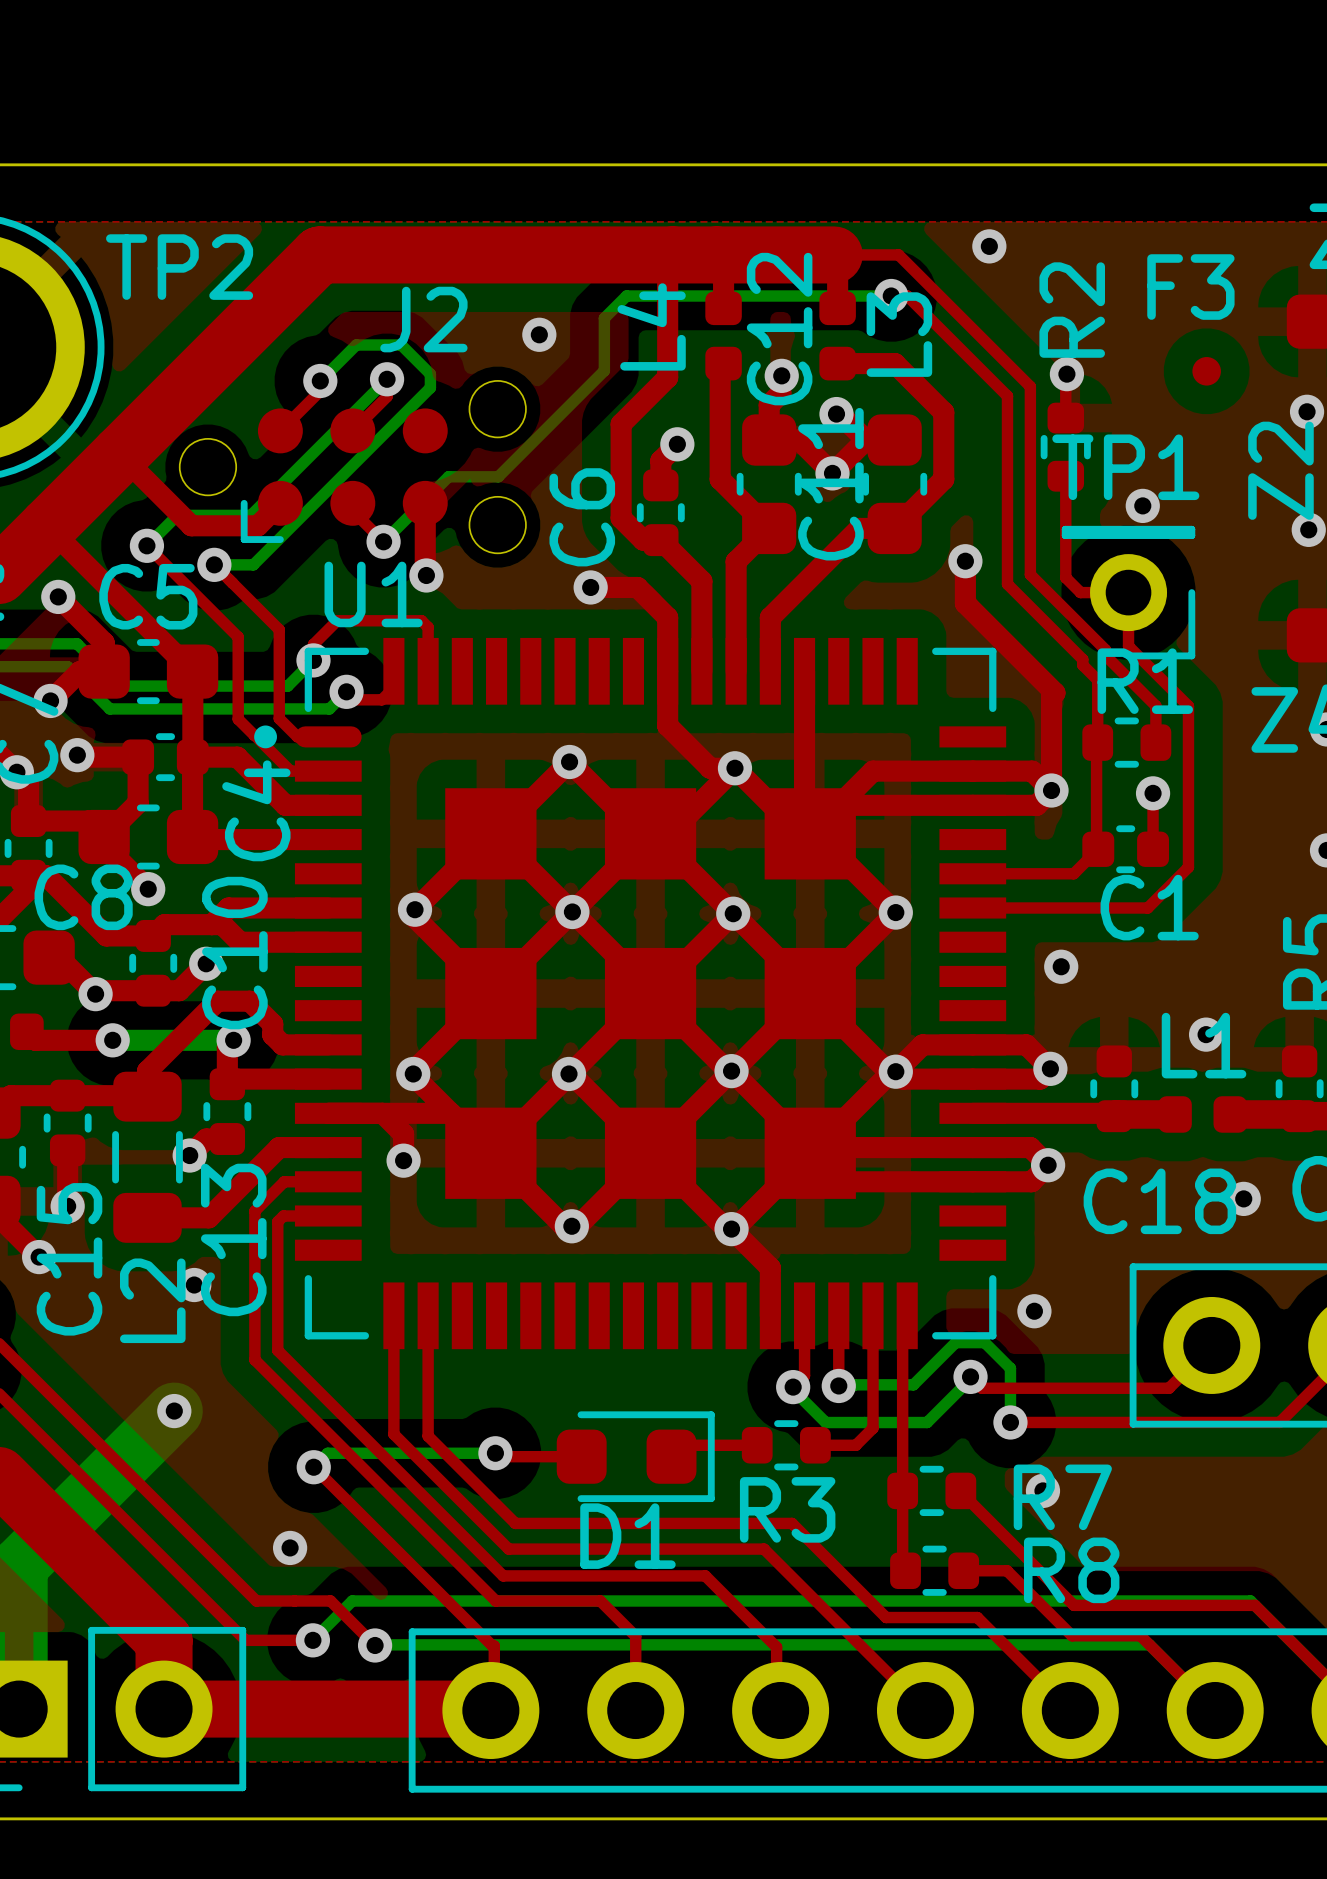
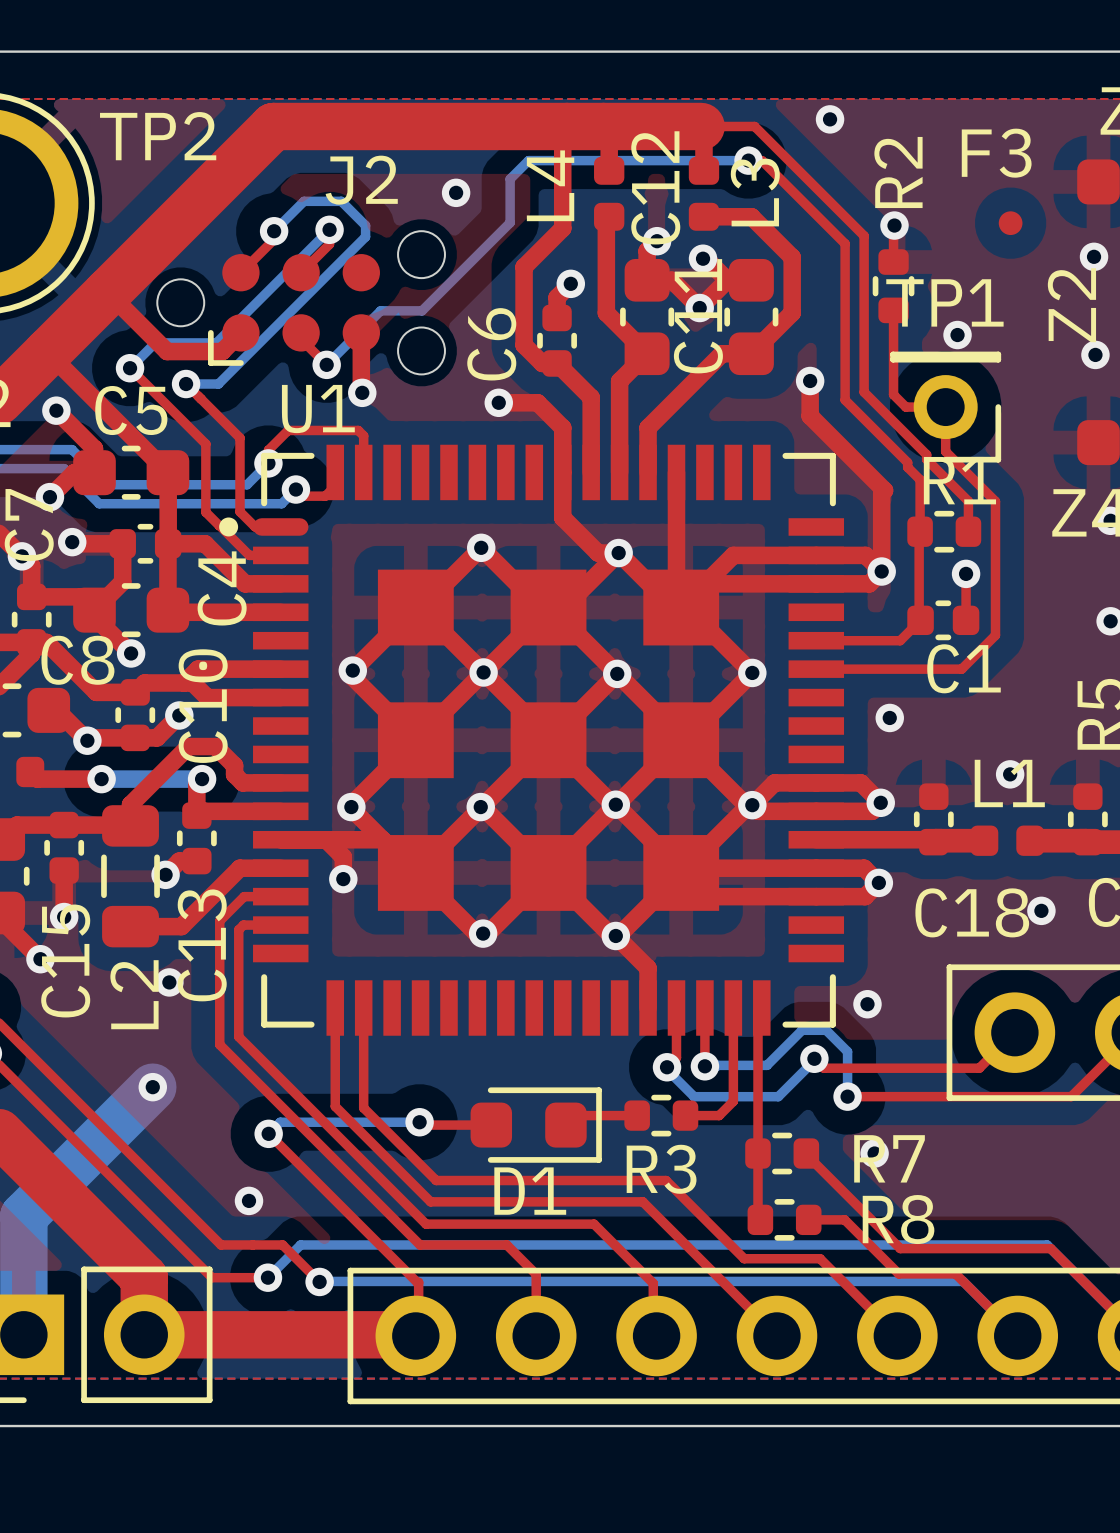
via position: (781, 375) -> (657, 241)

